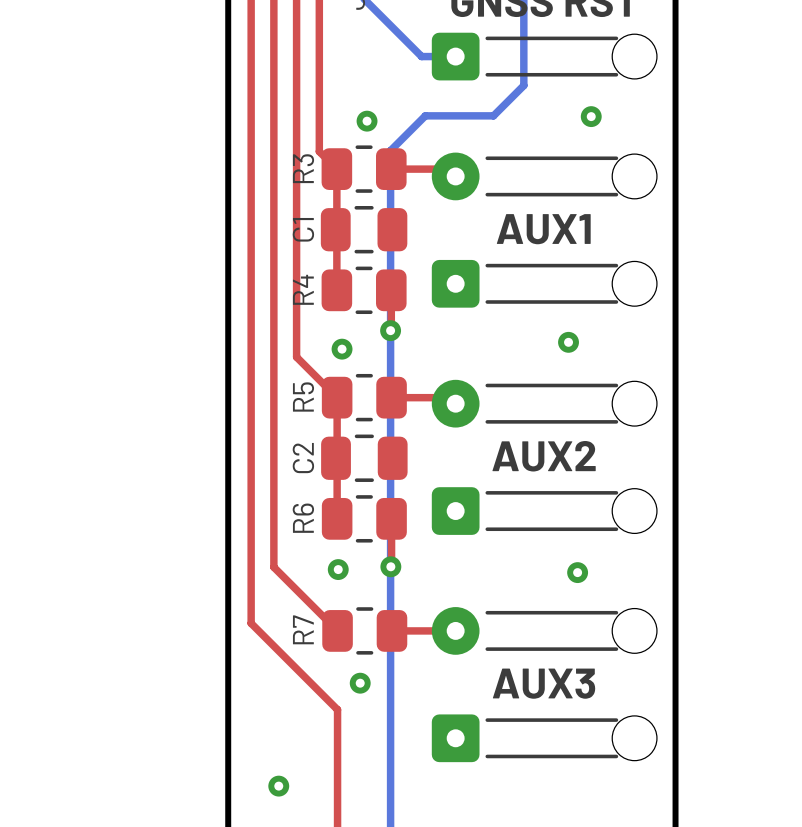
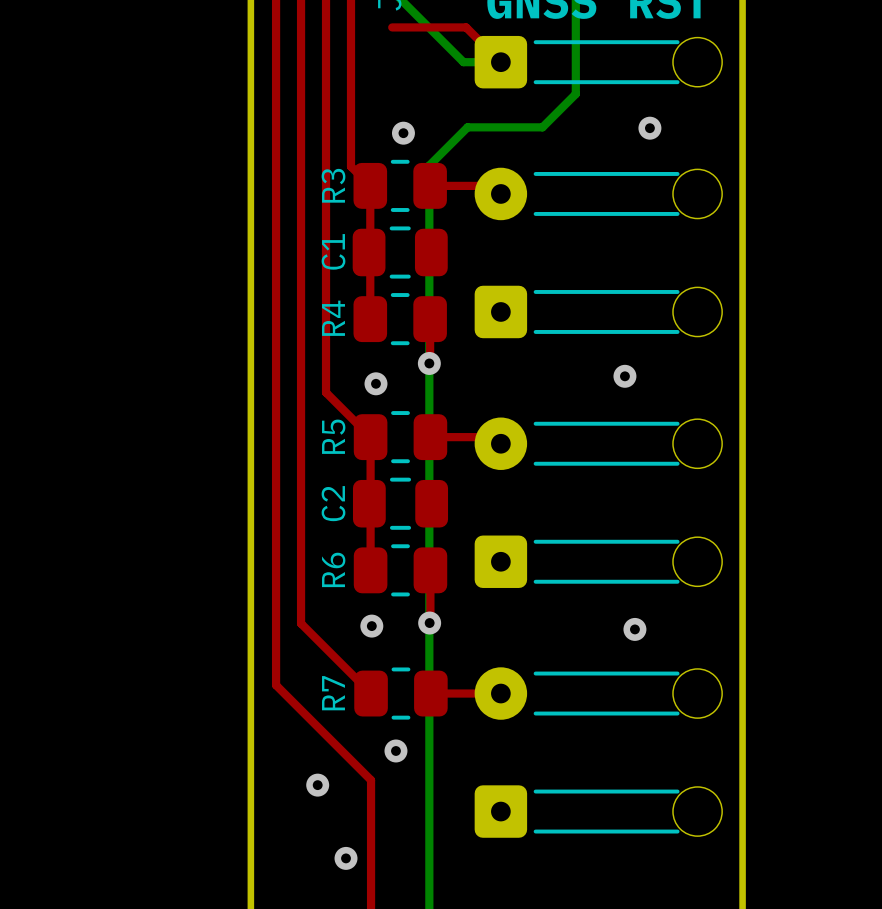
top track: none -> (392, 27) (466, 27) (500, 62)
text: AUX1 (543, 229) -> none
text: AUX2 (544, 456) -> none
text: AUX3 (544, 683) -> none
via: none -> (317, 785)
via: none -> (346, 858)
via: (278, 786) -> none

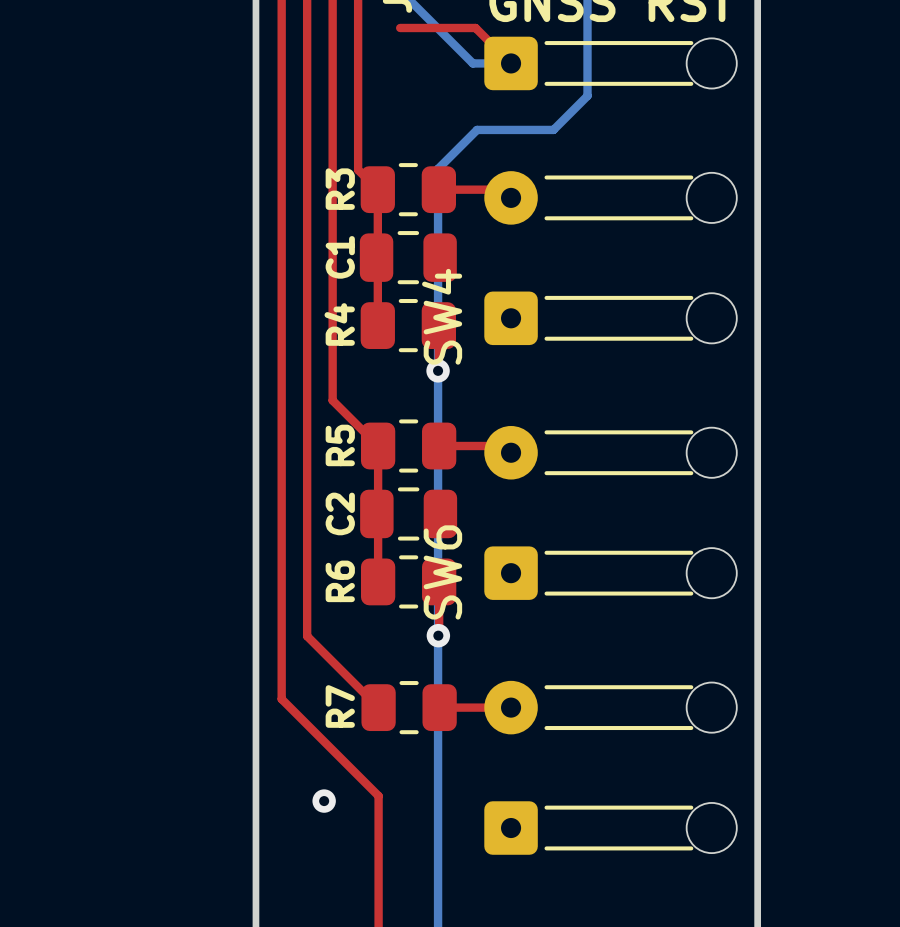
via: (649, 128) -> none
via: (403, 133) -> none
SW4 name: none -> SW4 (442, 316)
via: (624, 376) -> none
via: (375, 383) -> none
SW6 name: none -> SW6 (442, 572)
via: (371, 626) -> none
via: (634, 629) -> none
via: (395, 750) -> none
via: (346, 858) -> none

